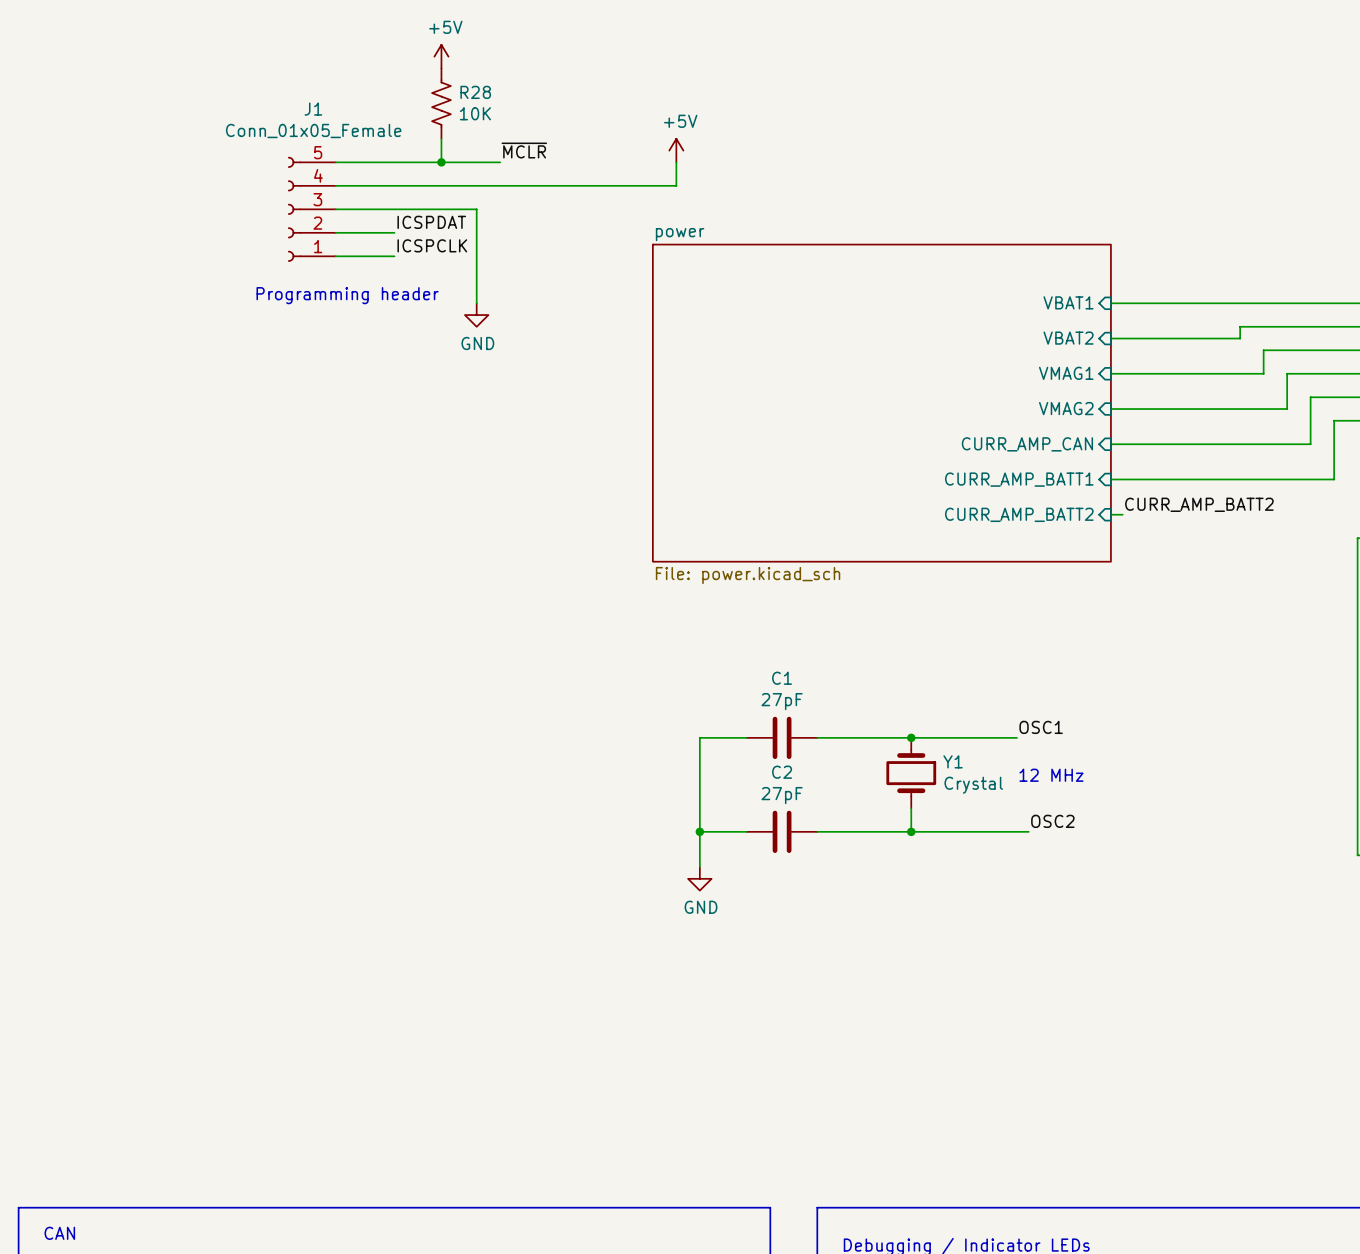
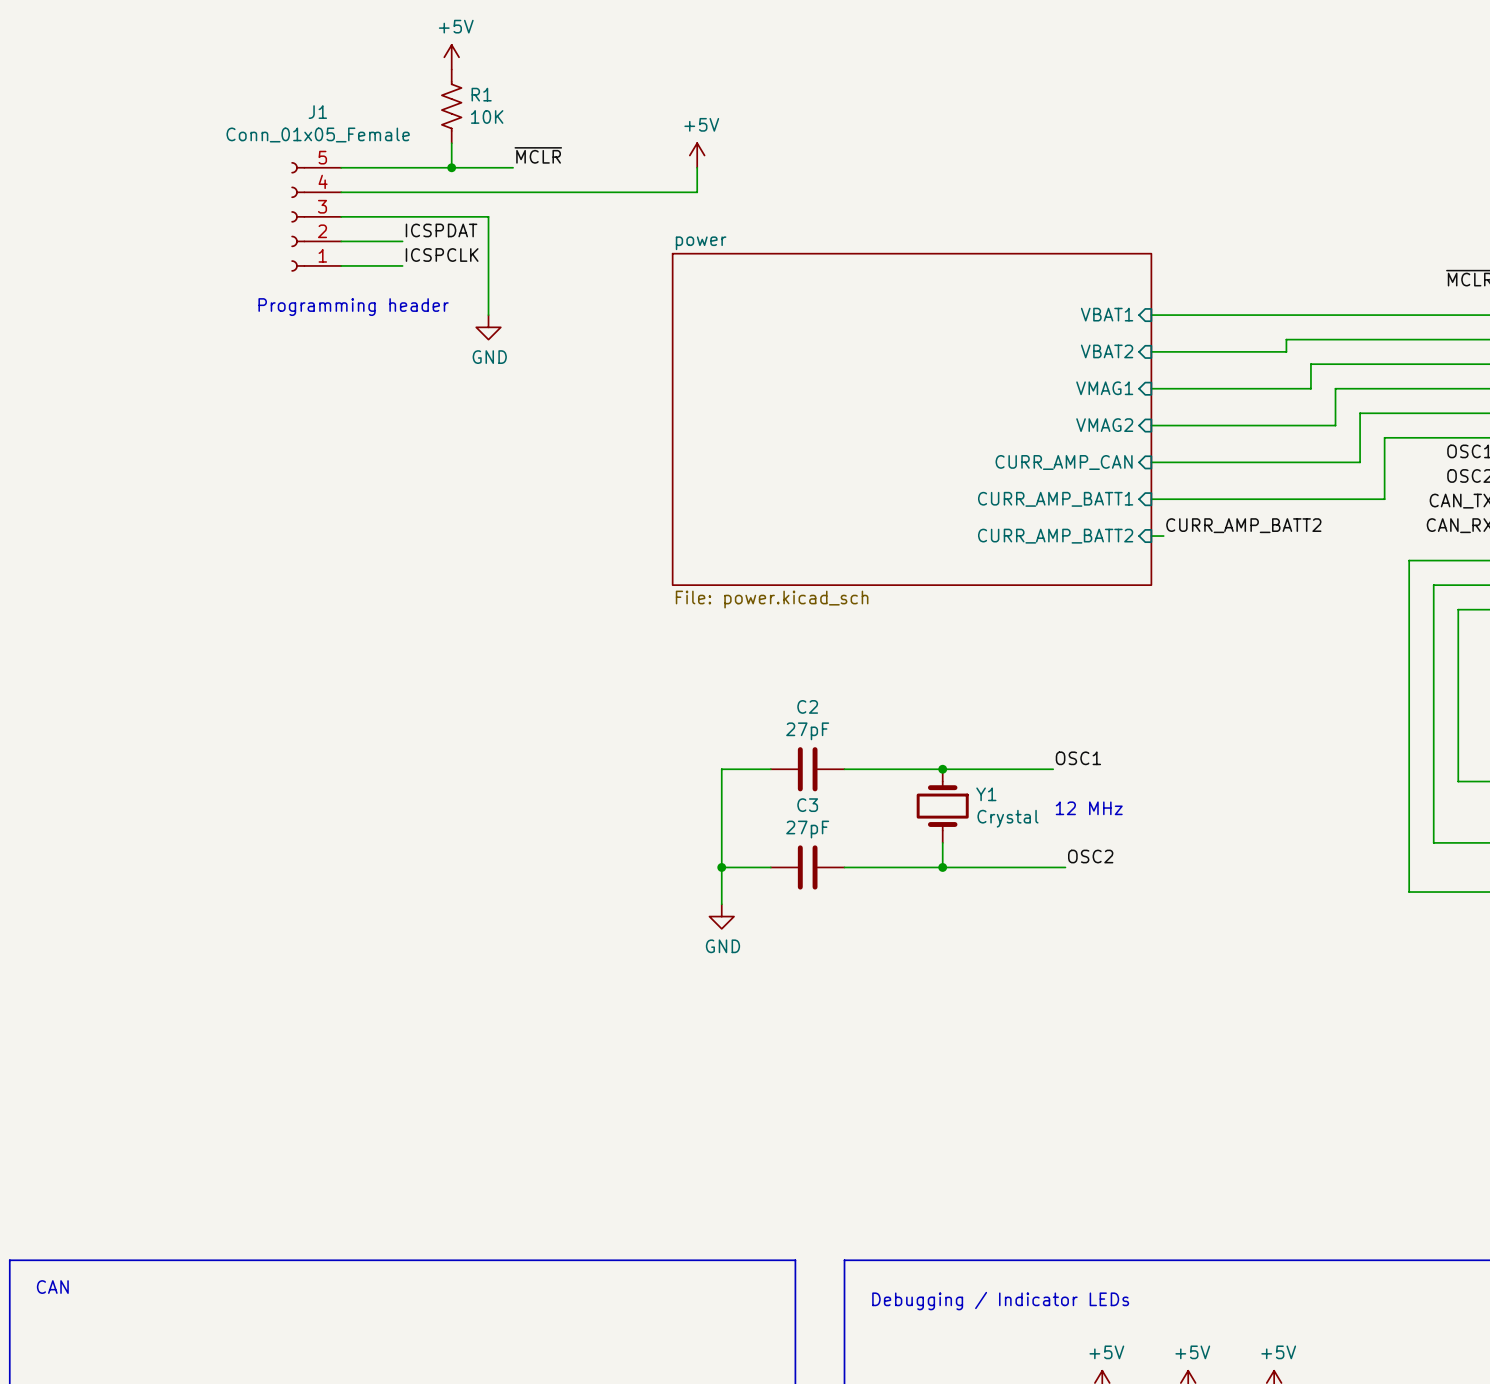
R28 name: R28 (475, 92) -> R1 (481, 94)
C1 name: C1 (782, 678) -> C2 (807, 706)
C2 name: C2 (782, 772) -> C3 (807, 805)

